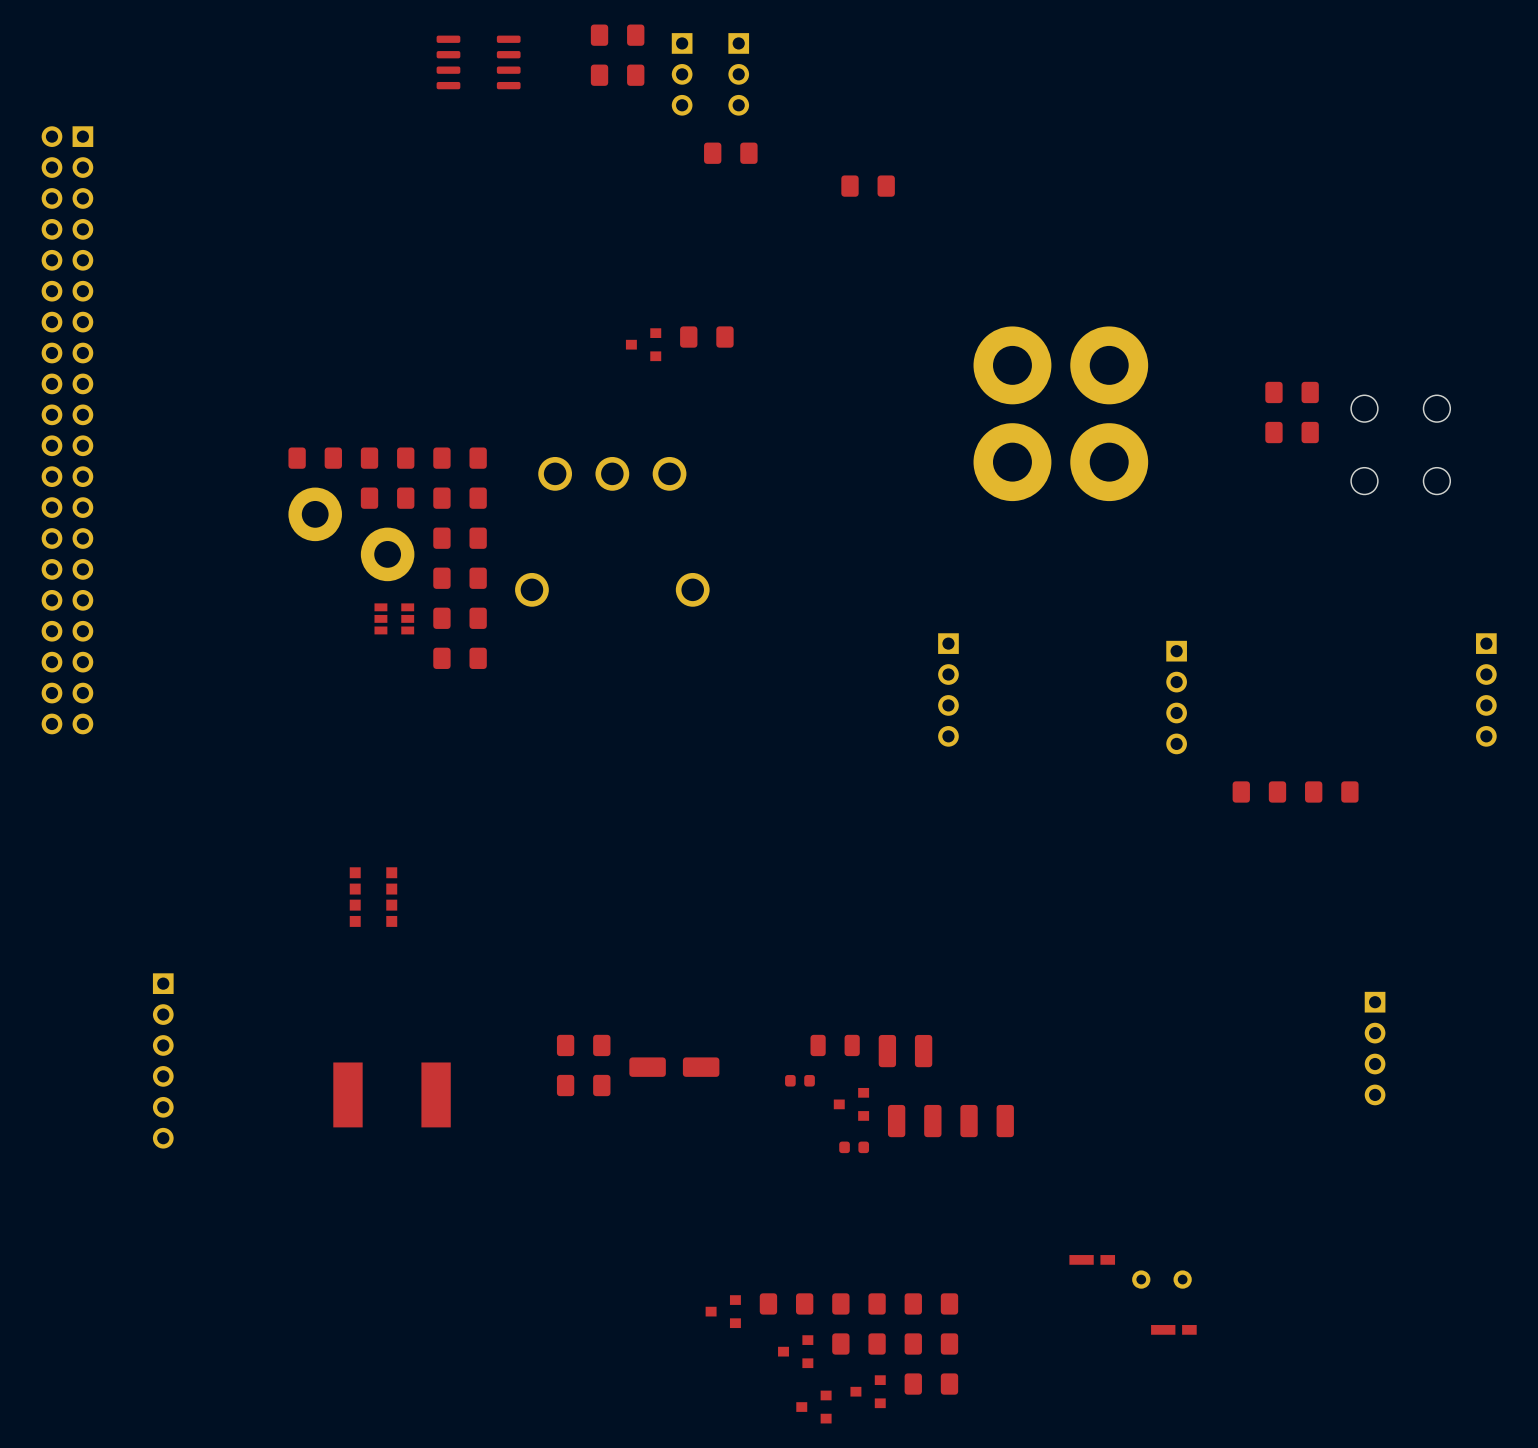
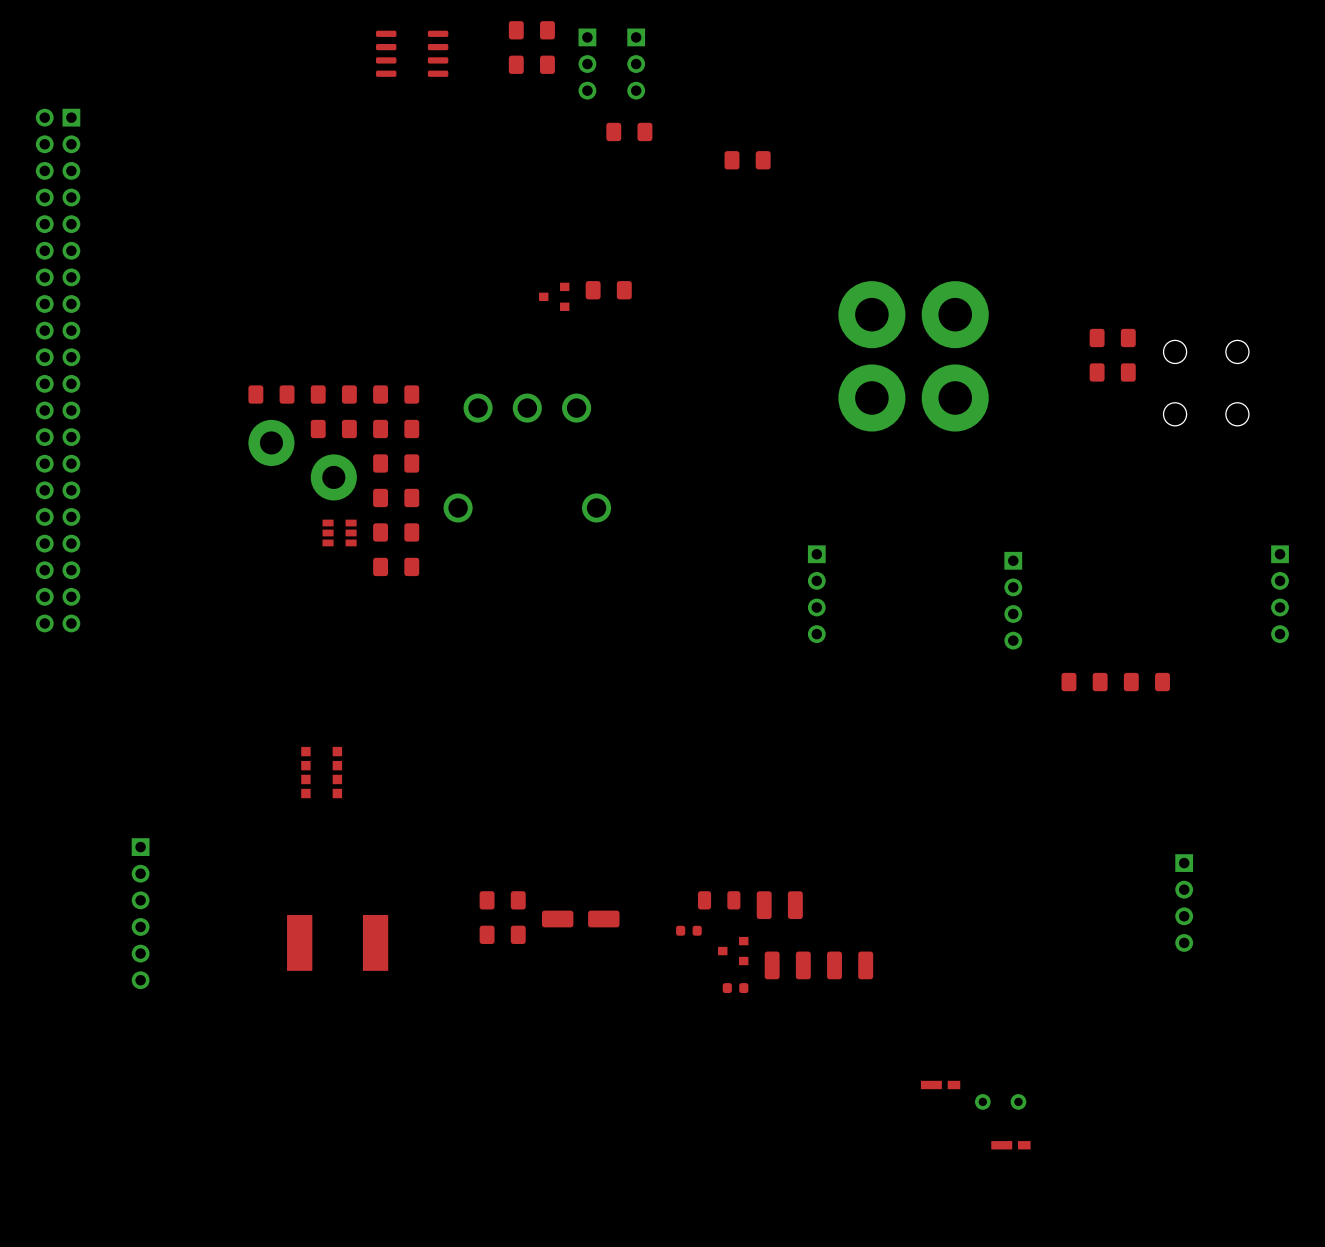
part: (786, 1303) -> none
part: (858, 1303) -> none
part: (931, 1303) -> none
part: (723, 1311) -> none
part: (858, 1343) -> none
part: (931, 1343) -> none
part: (795, 1351) -> none
part: (931, 1384) -> none
part: (868, 1391) -> none
part: (813, 1407) -> none

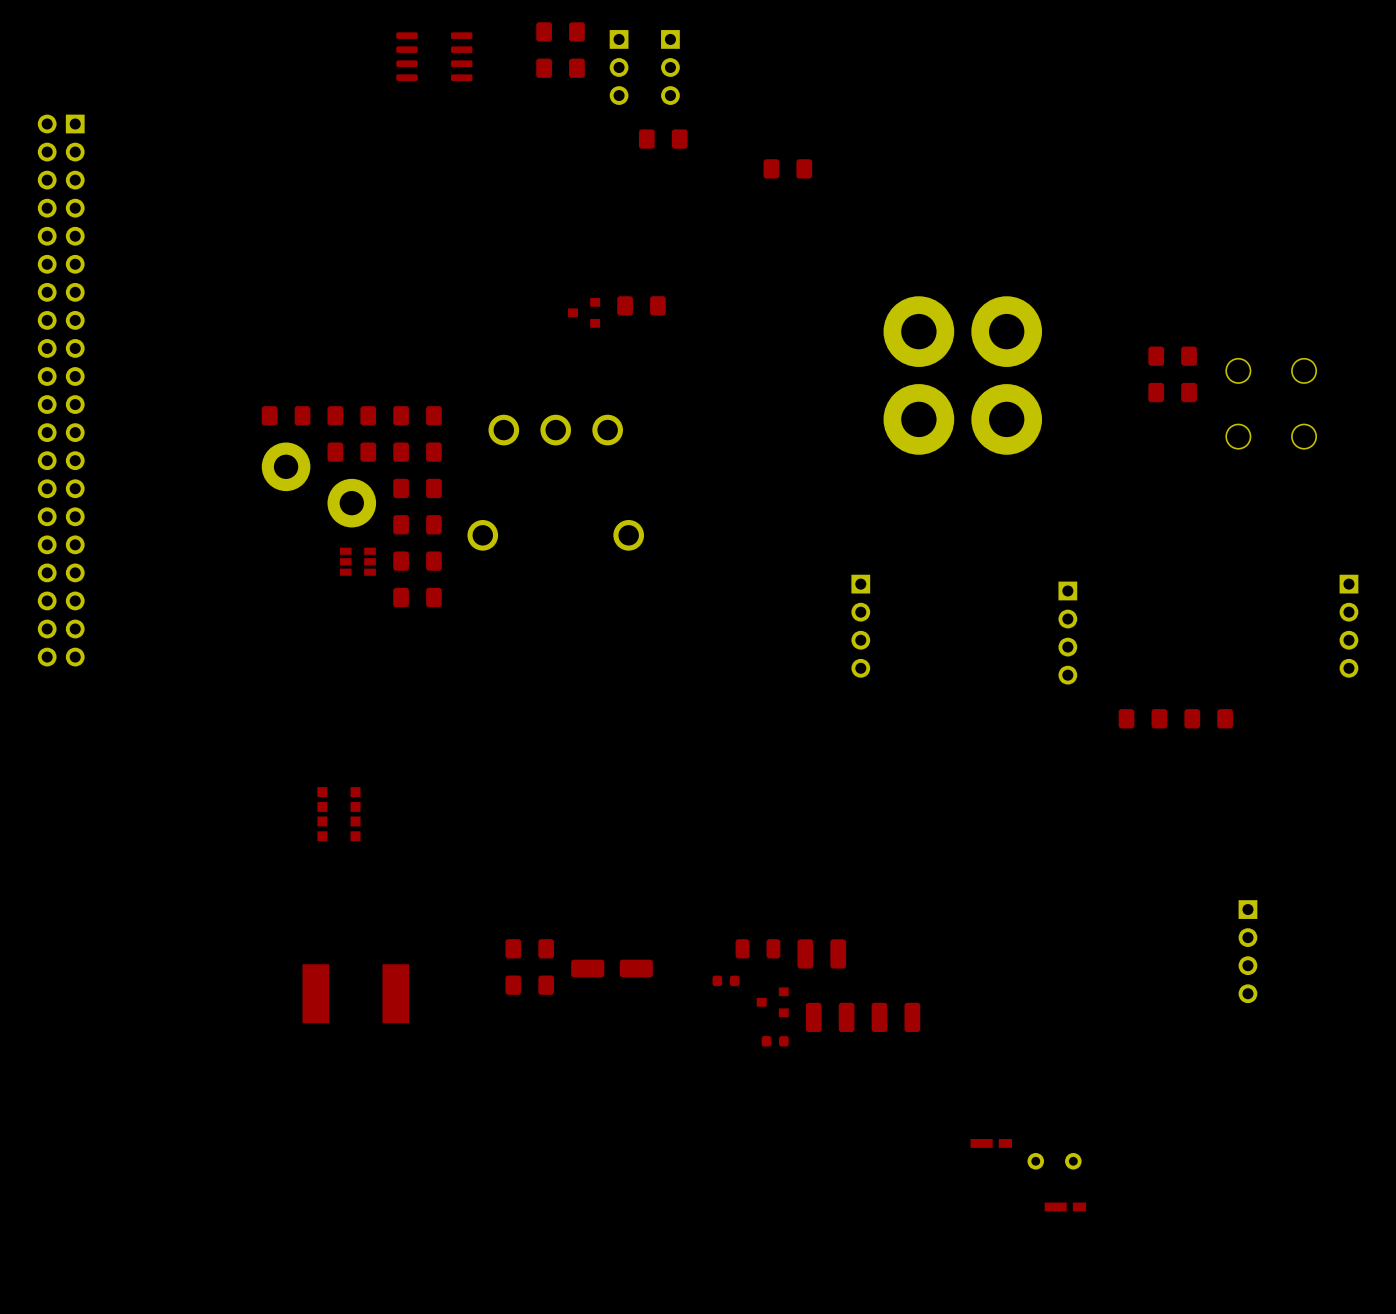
part: (140, 913) -> none

